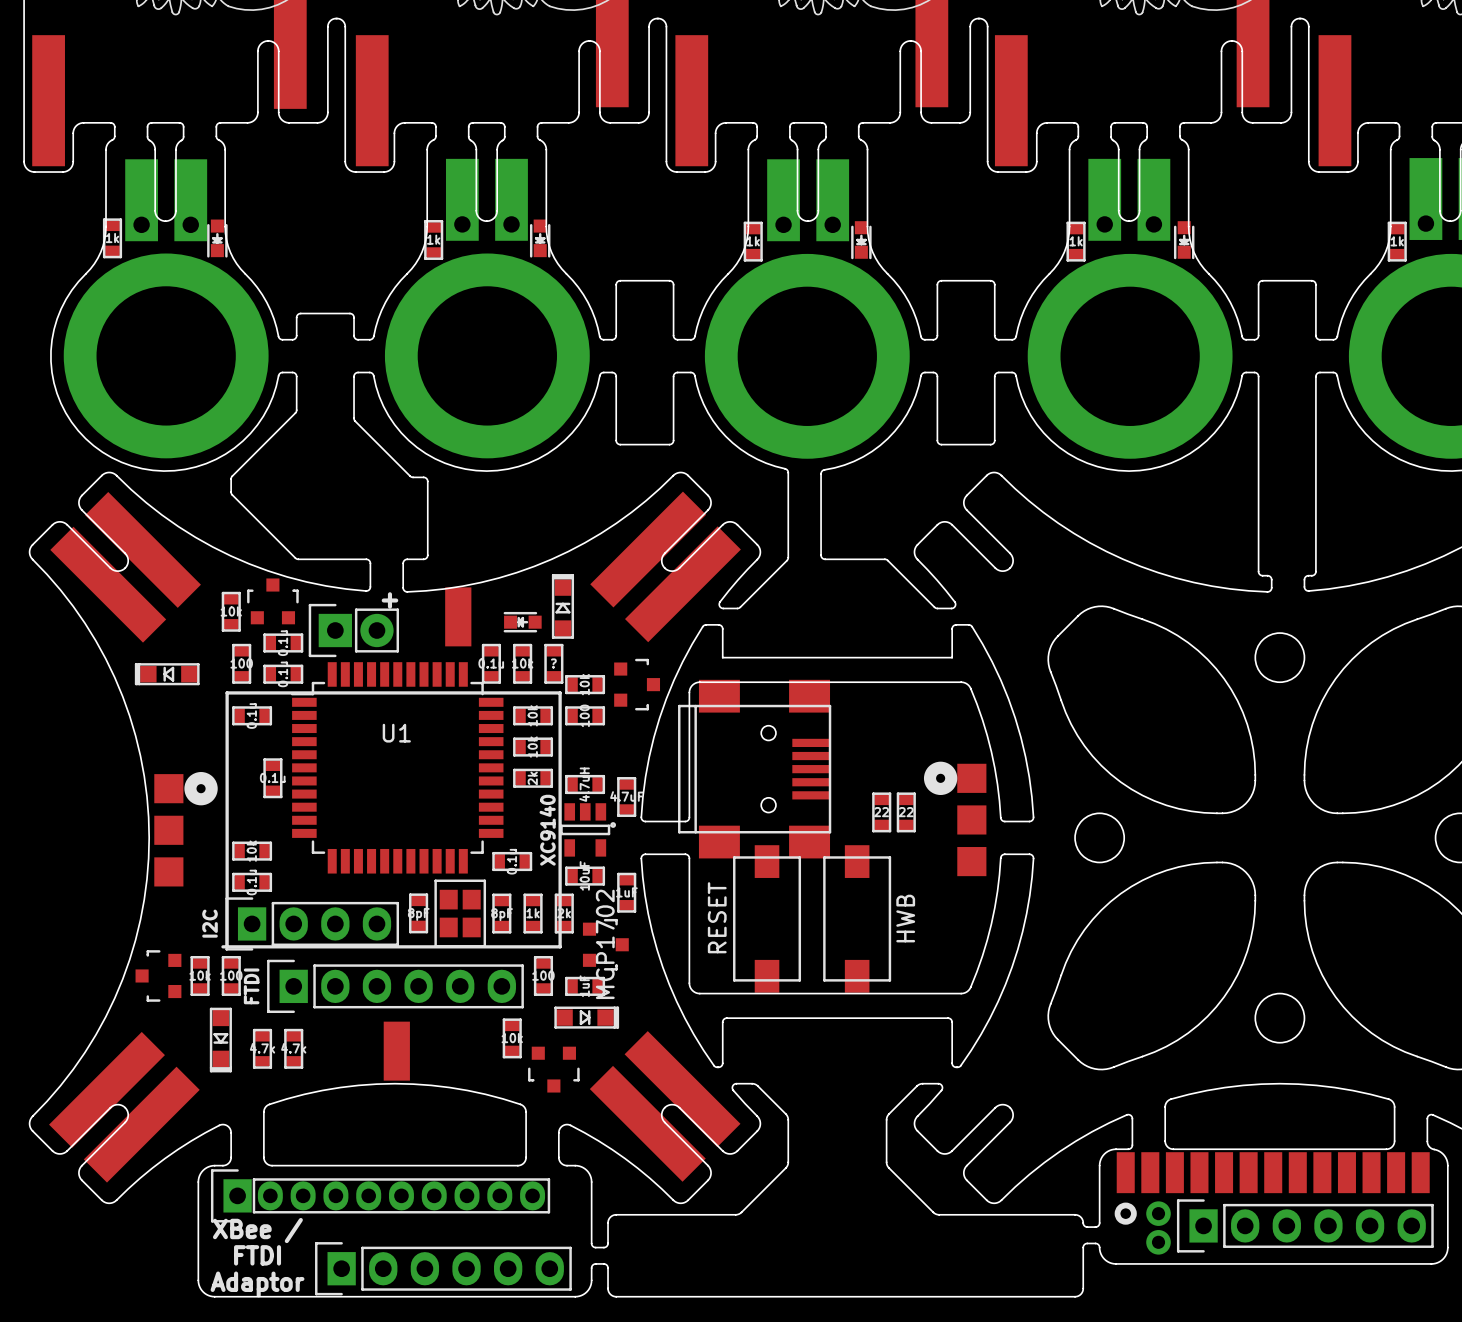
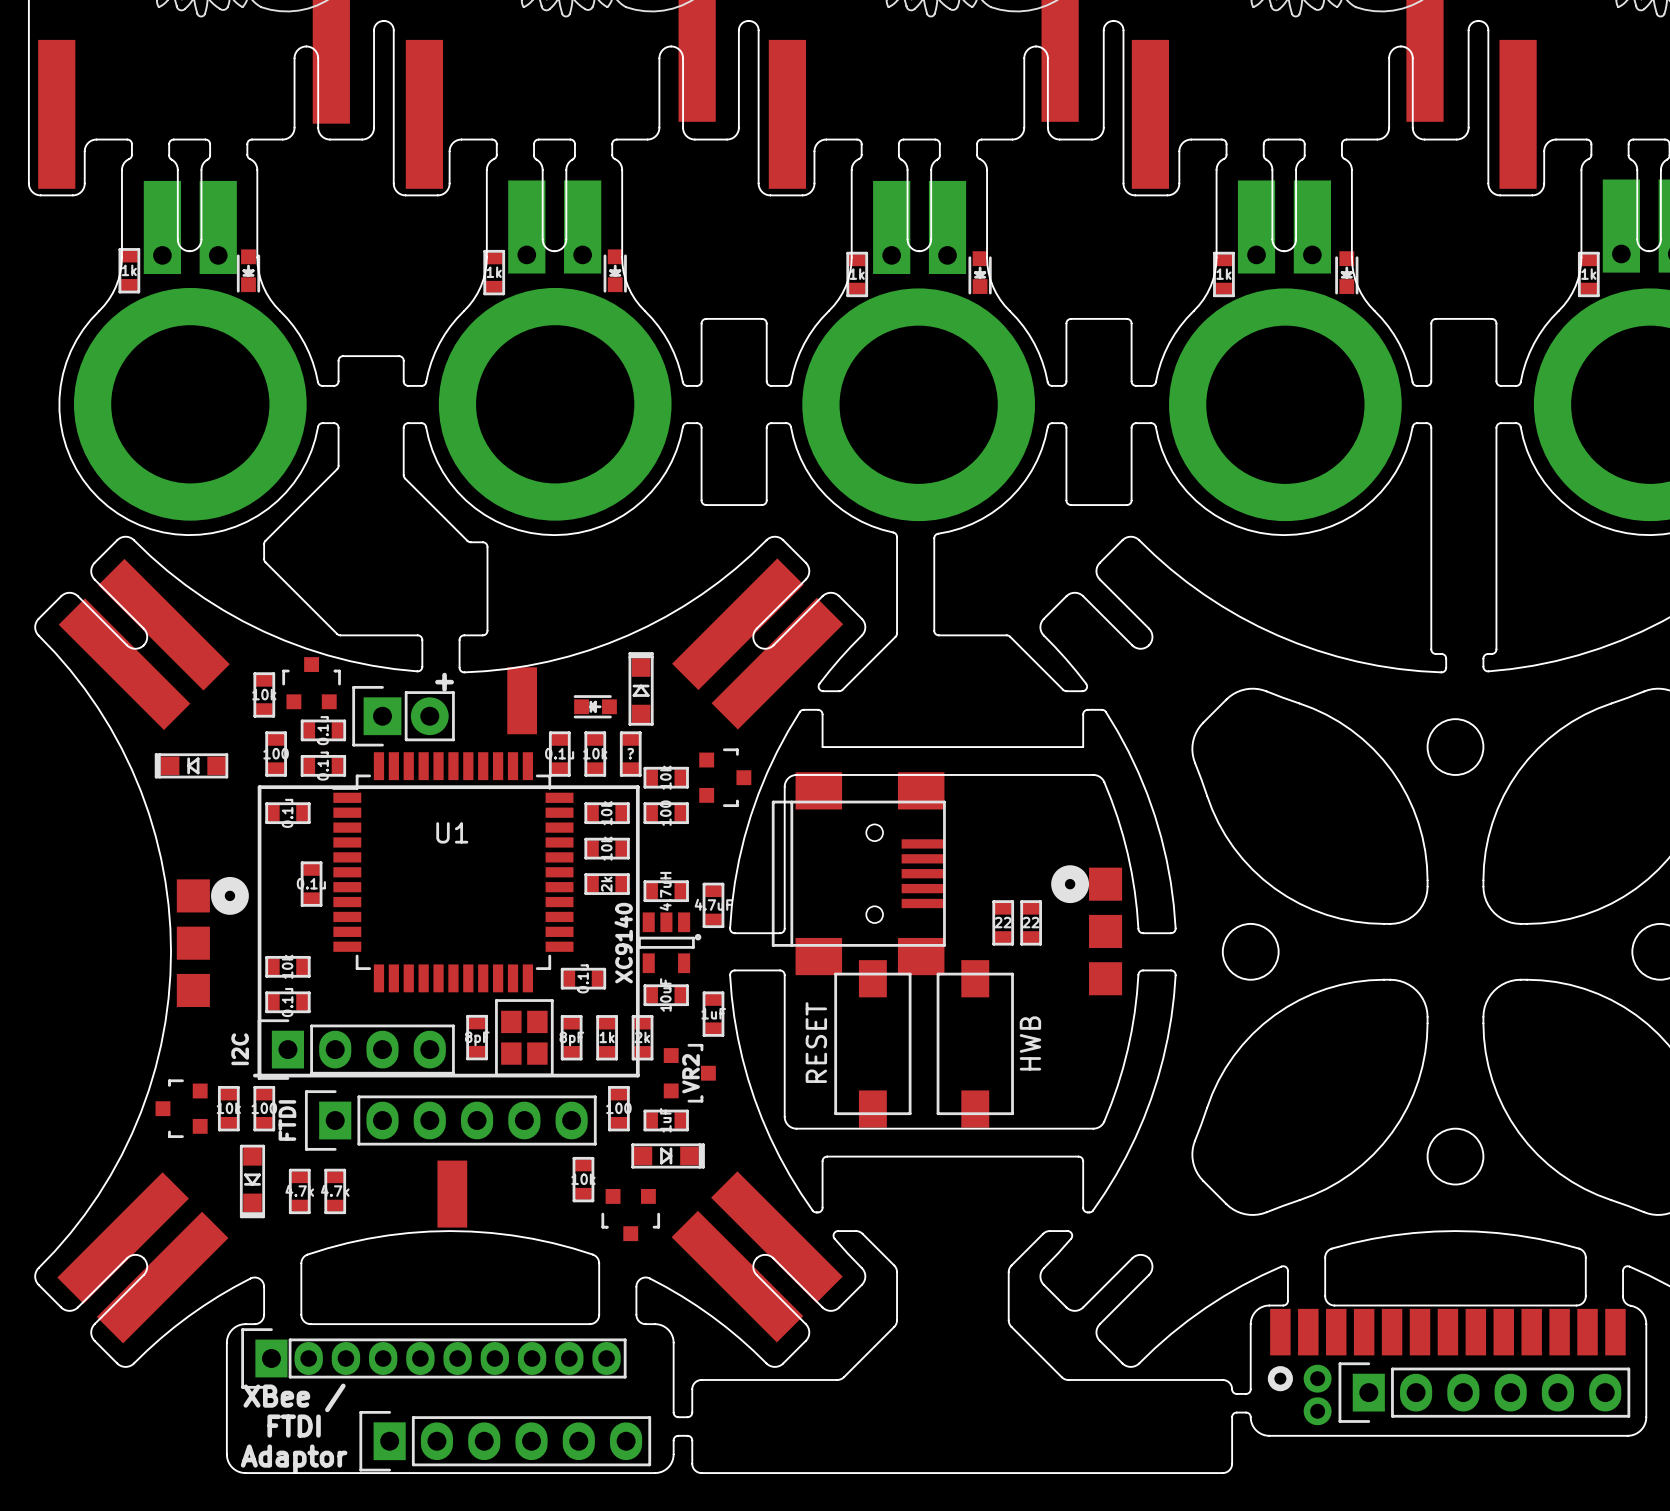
VR2 value: MCP1702 (605, 944) -> none
VR2 name: none -> VR2 (691, 1073)

